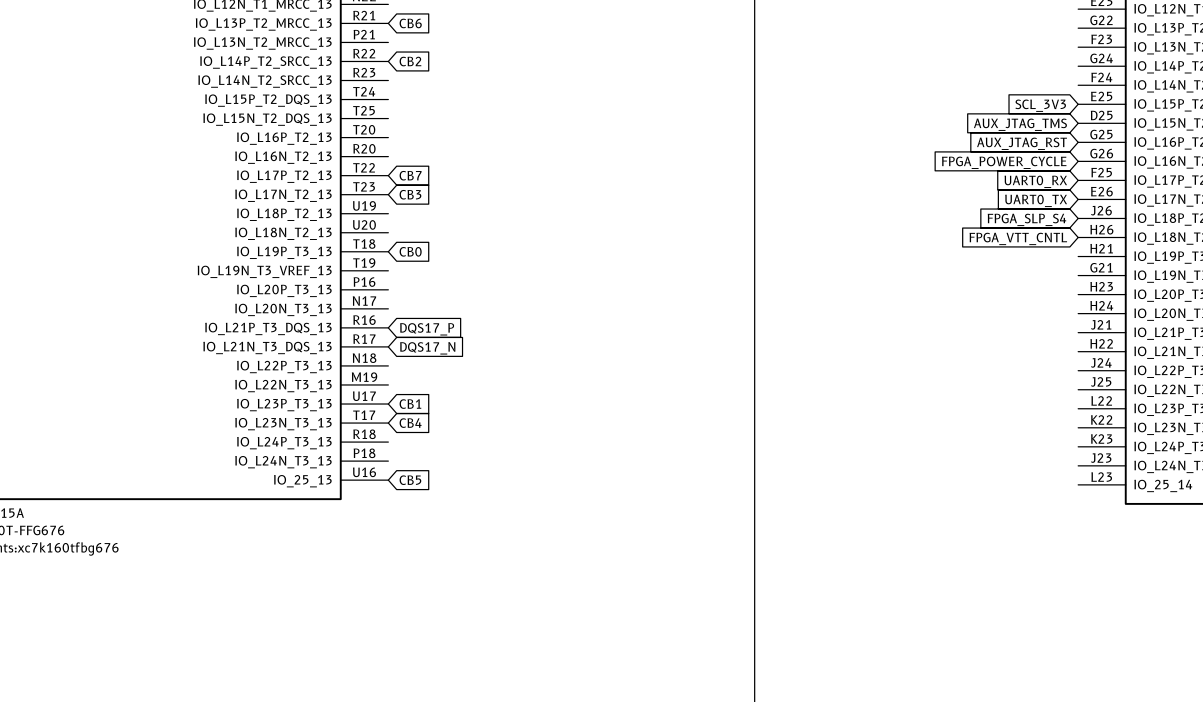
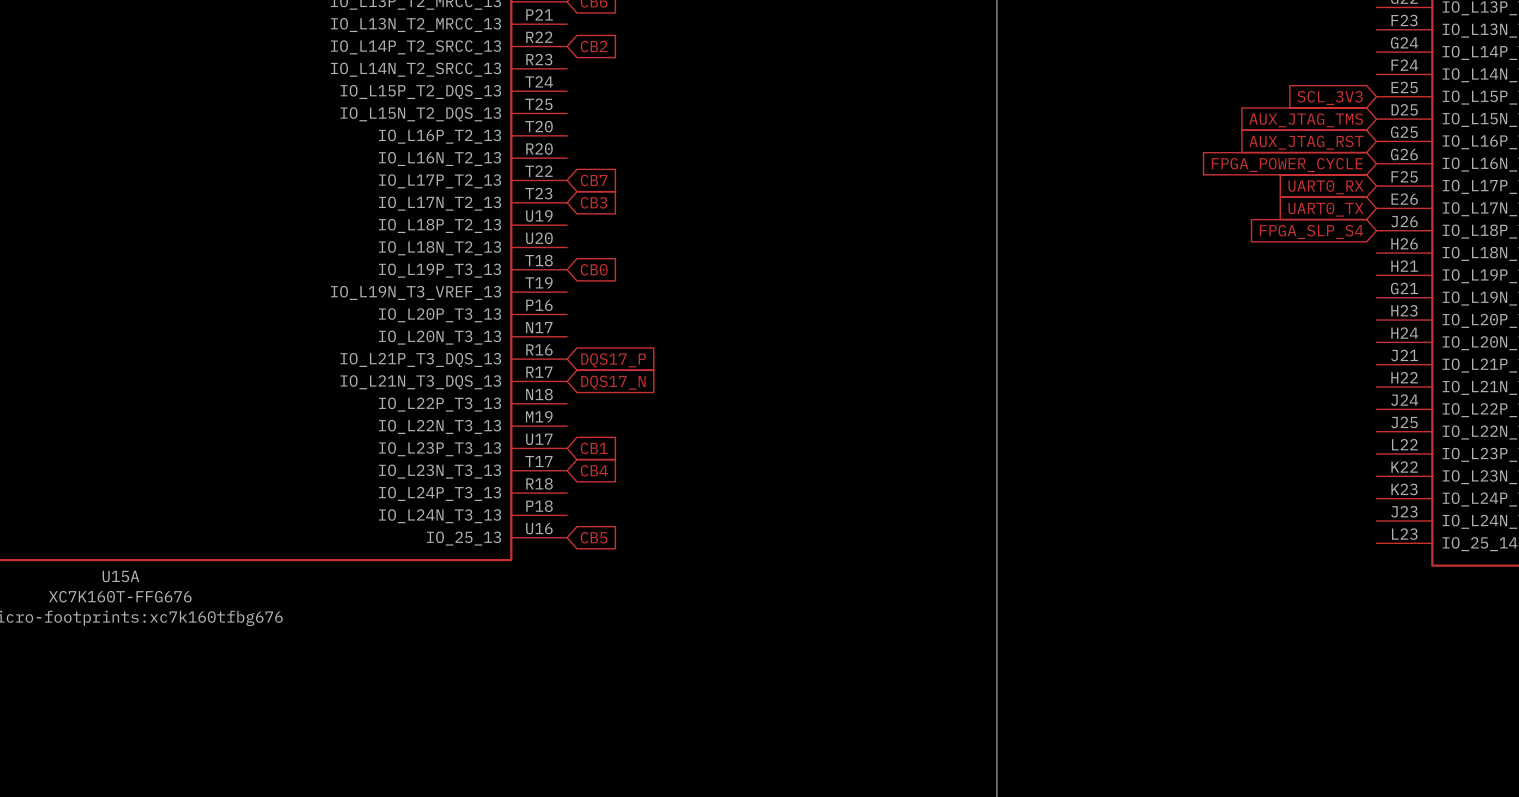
global label: FPGA_VTT_CNTL (1018, 238) -> none

